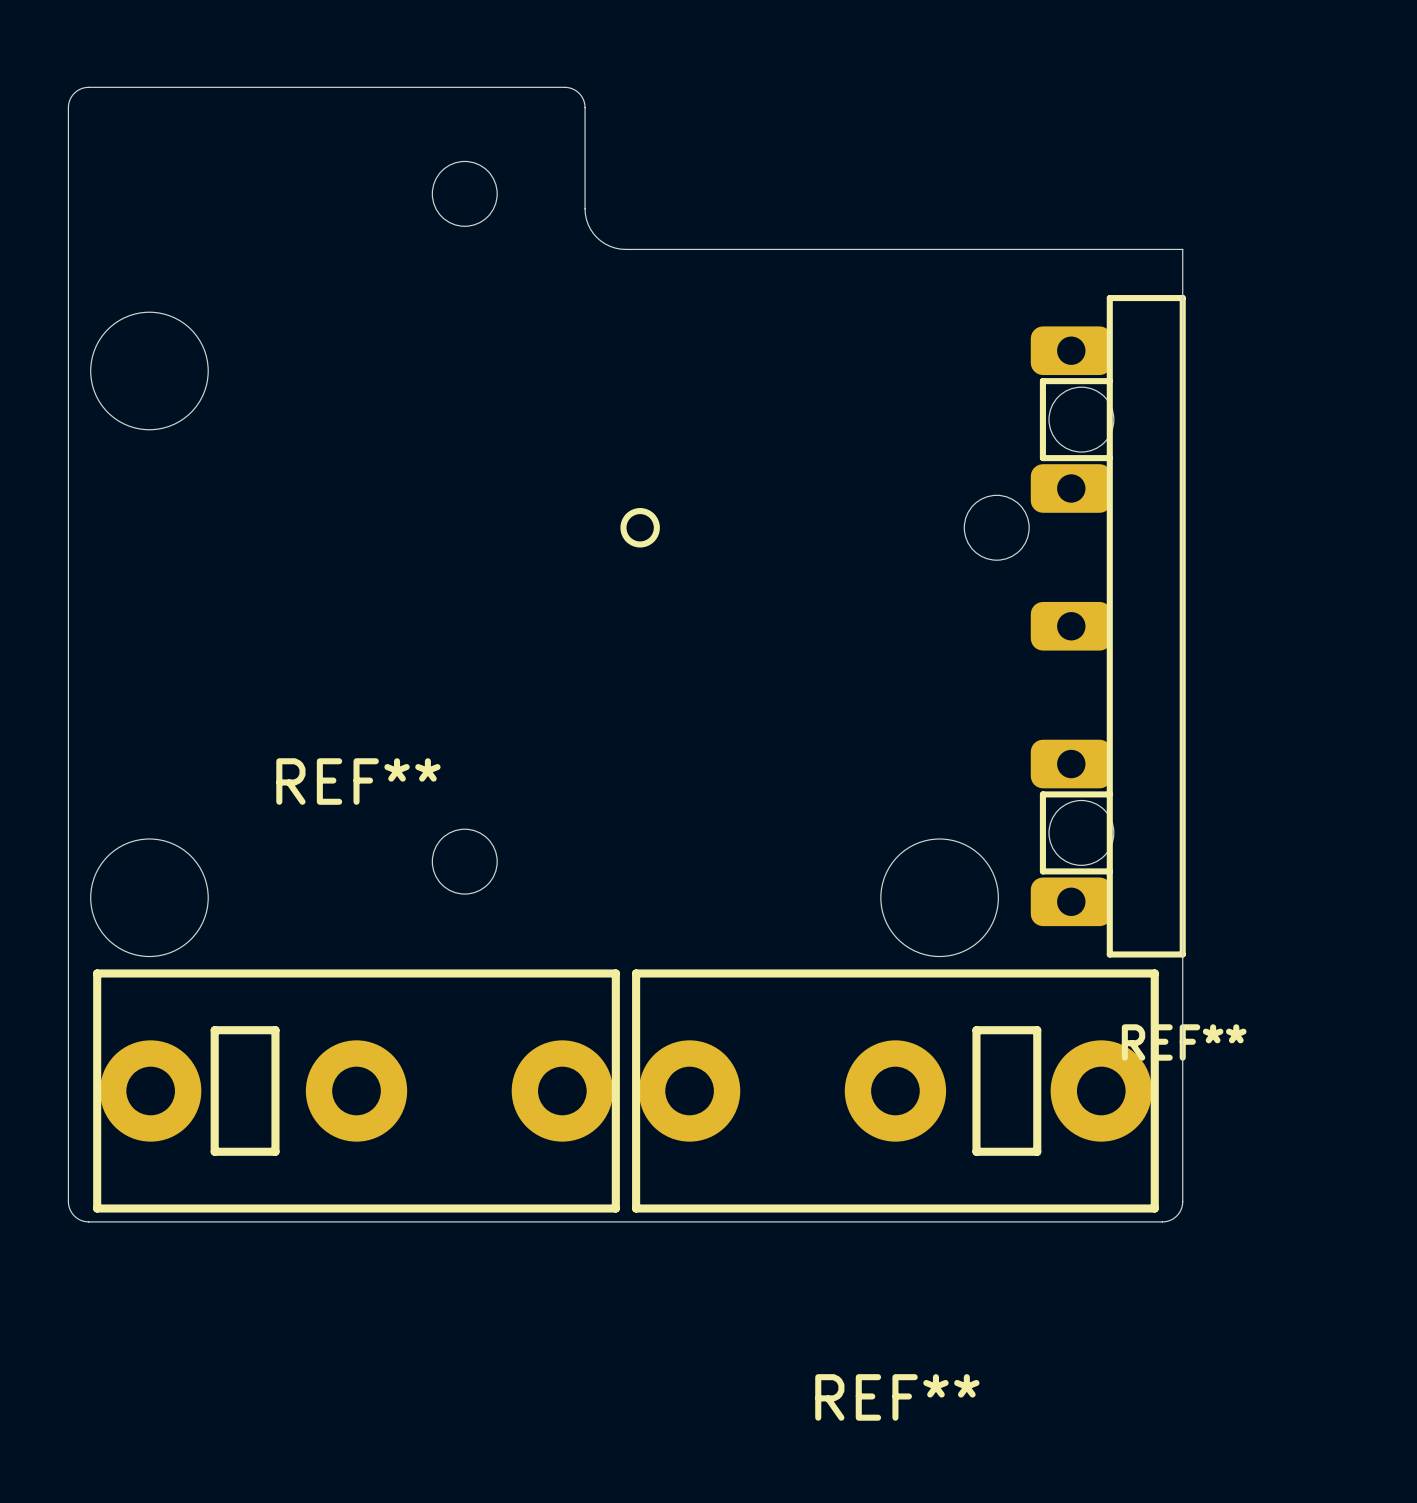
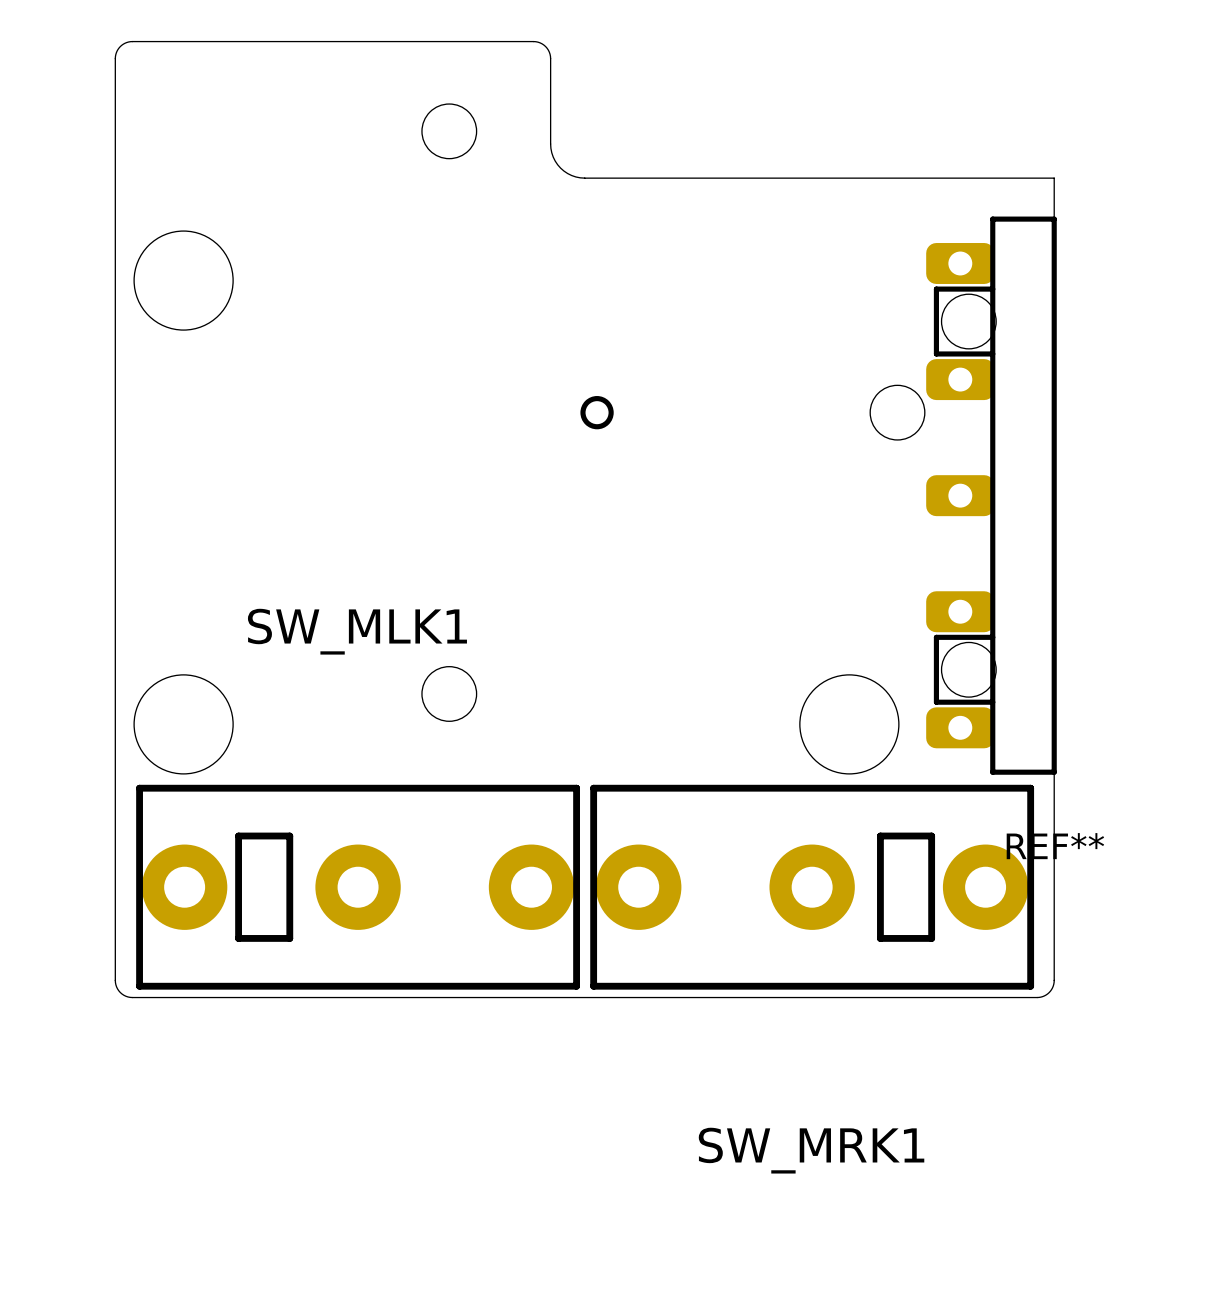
REF** name: REF** (358, 781) -> SW_MLK1 (357, 631)
REF** name: REF** (897, 1397) -> SW_MRK1 (811, 1150)

